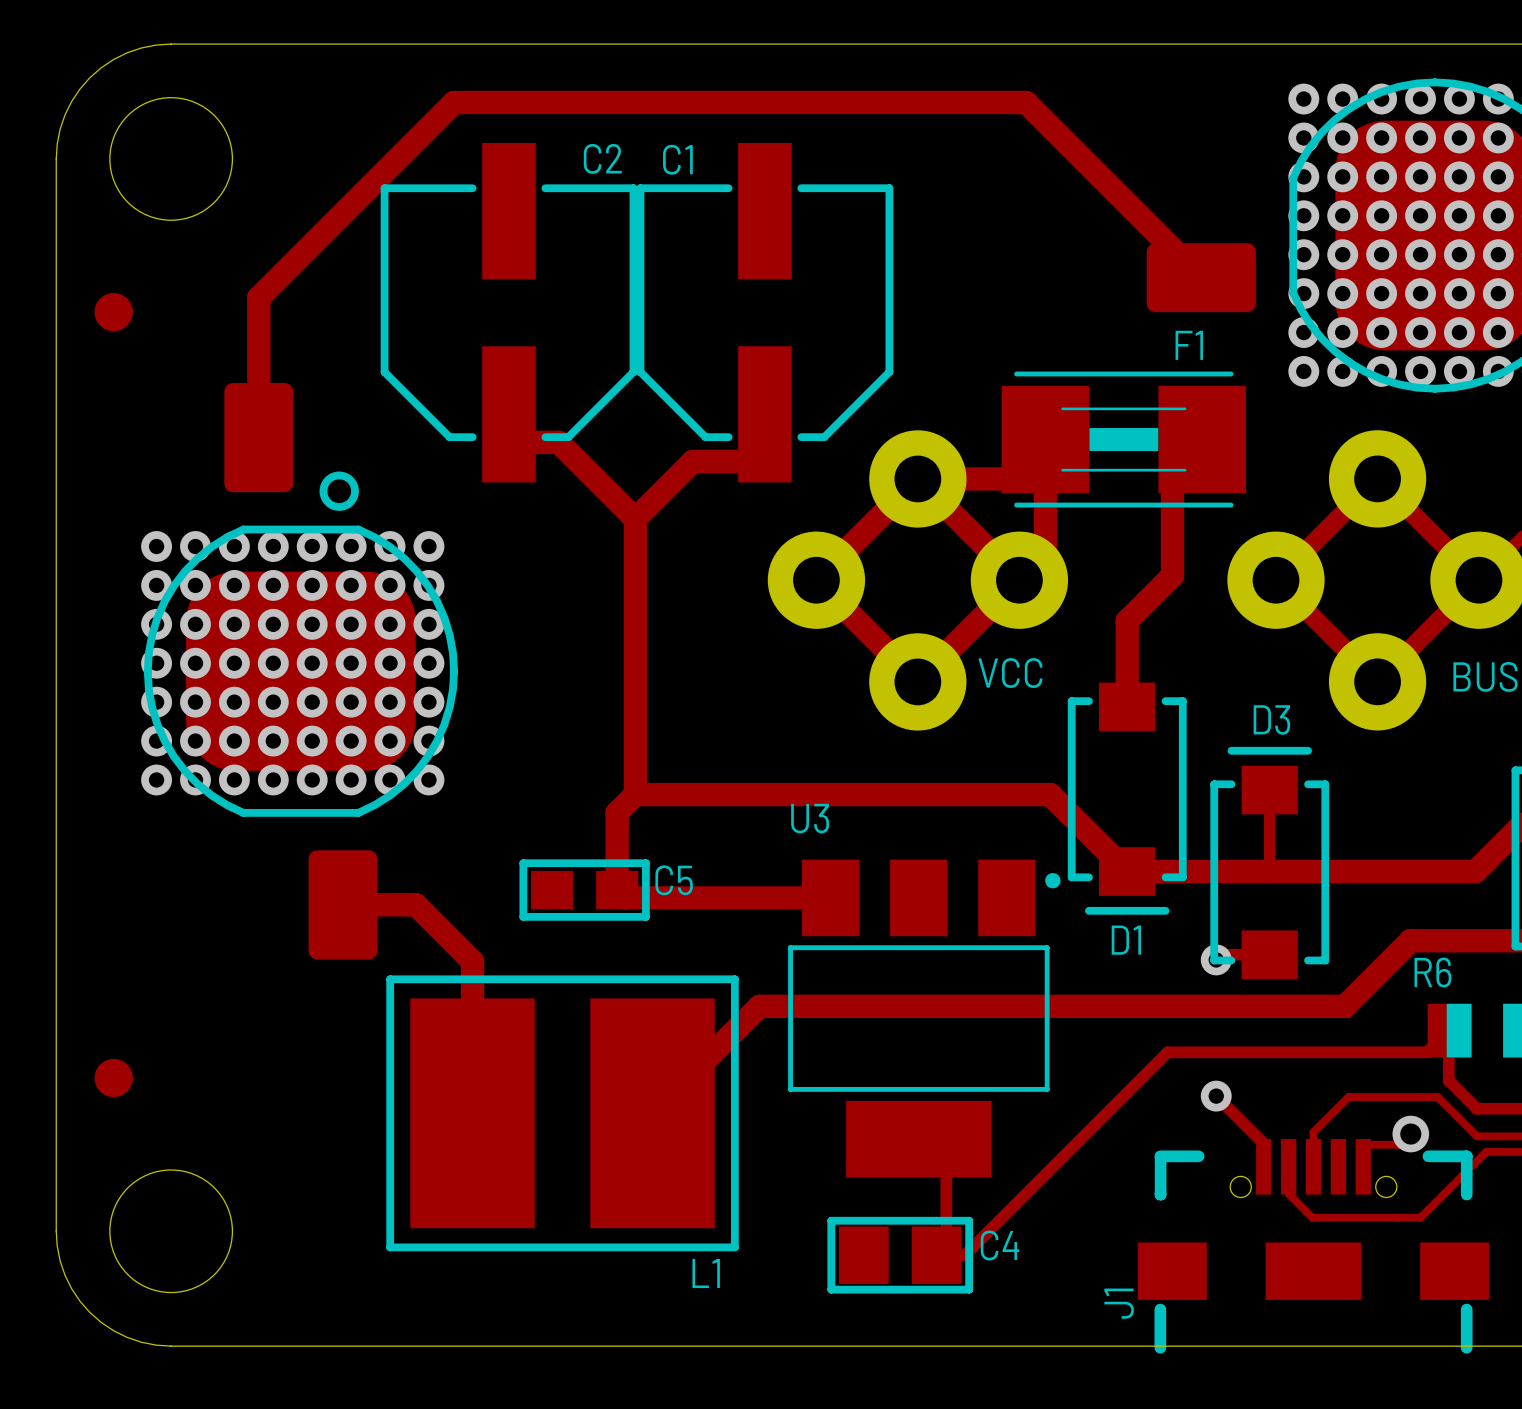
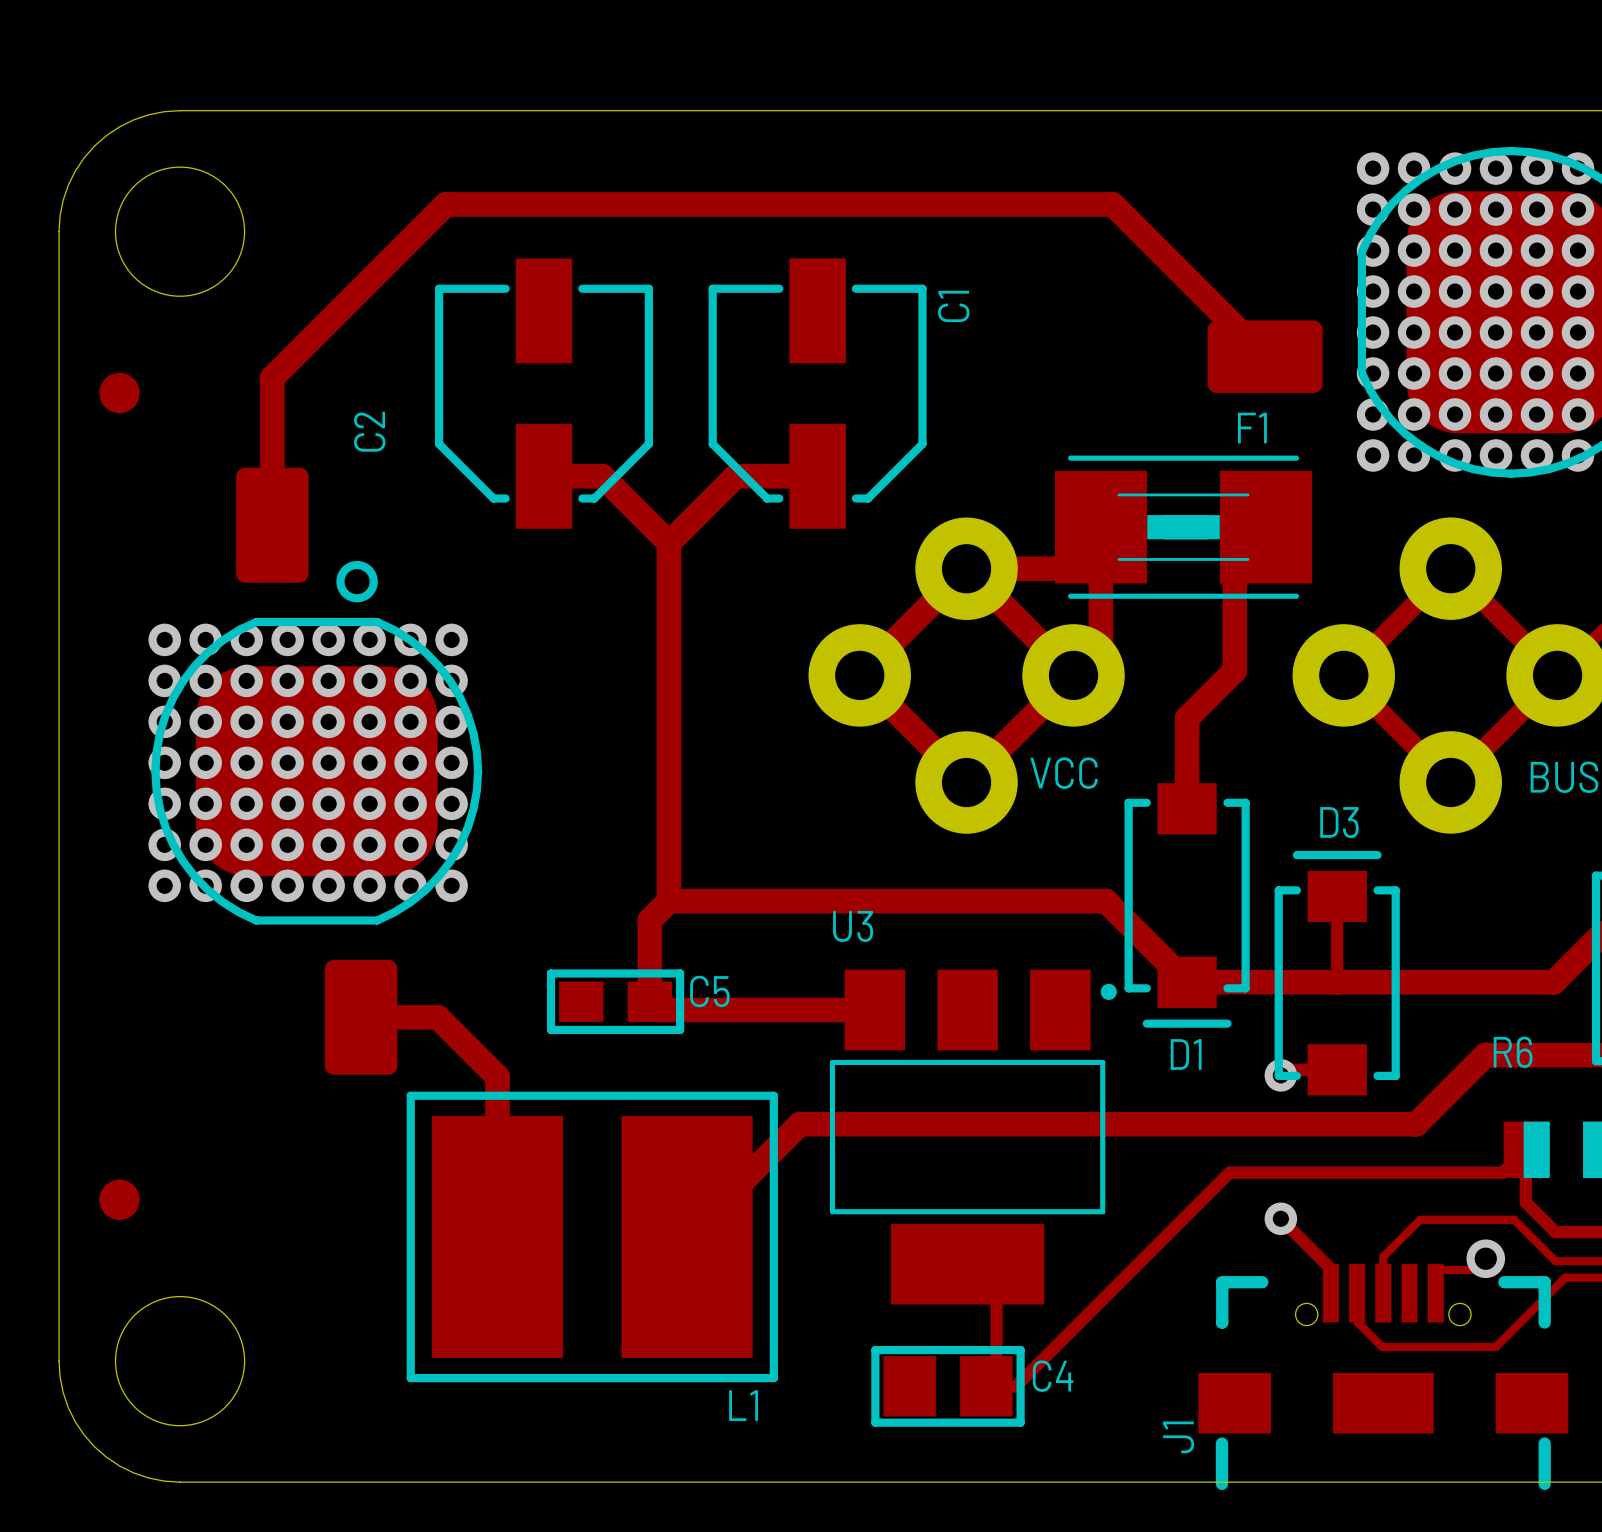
track: (423, 133) (454, 102) (1026, 102) (1056, 133) -> (445, 204) (1112, 204)
C2 footprint: [380, 142, 638, 483] -> [435, 258, 653, 529]
C1 footprint: [636, 142, 894, 483] -> [708, 258, 927, 529]
C2 name position: C2 (602, 158) -> C2 (369, 431)
C1 name position: C1 (677, 159) -> C1 (953, 306)
track: none -> (543, 476) (602, 476) (669, 542)
track: none -> (817, 476) (735, 476) (669, 542)
track: (531, 442) (558, 442) (635, 518) (692, 461) (757, 461) -> none
track: none -> (669, 542) (669, 610)
R6 name position: R6 (1432, 972) -> R6 (1513, 1052)

